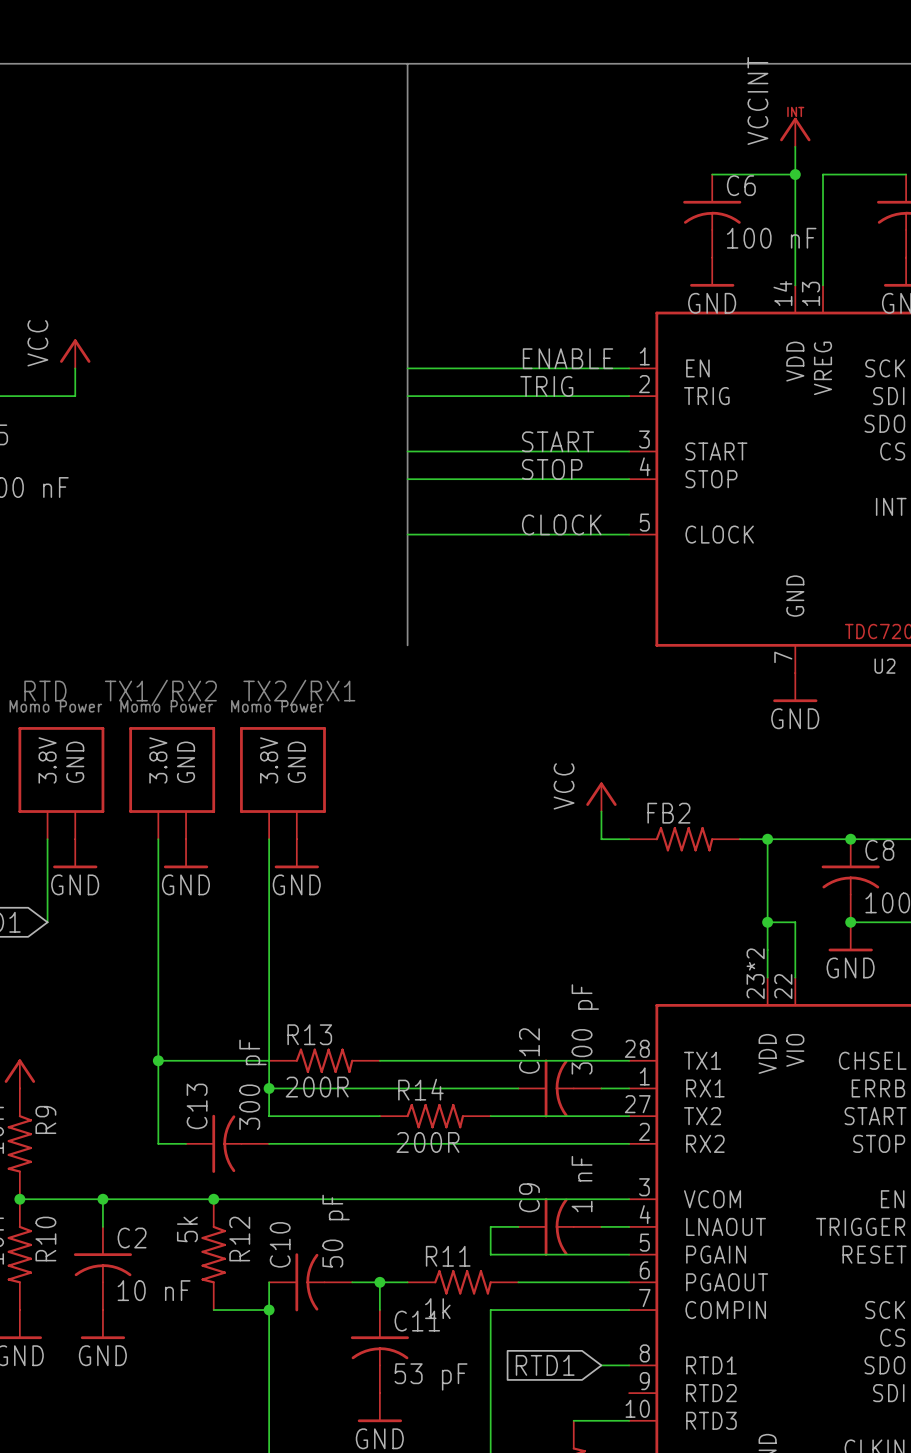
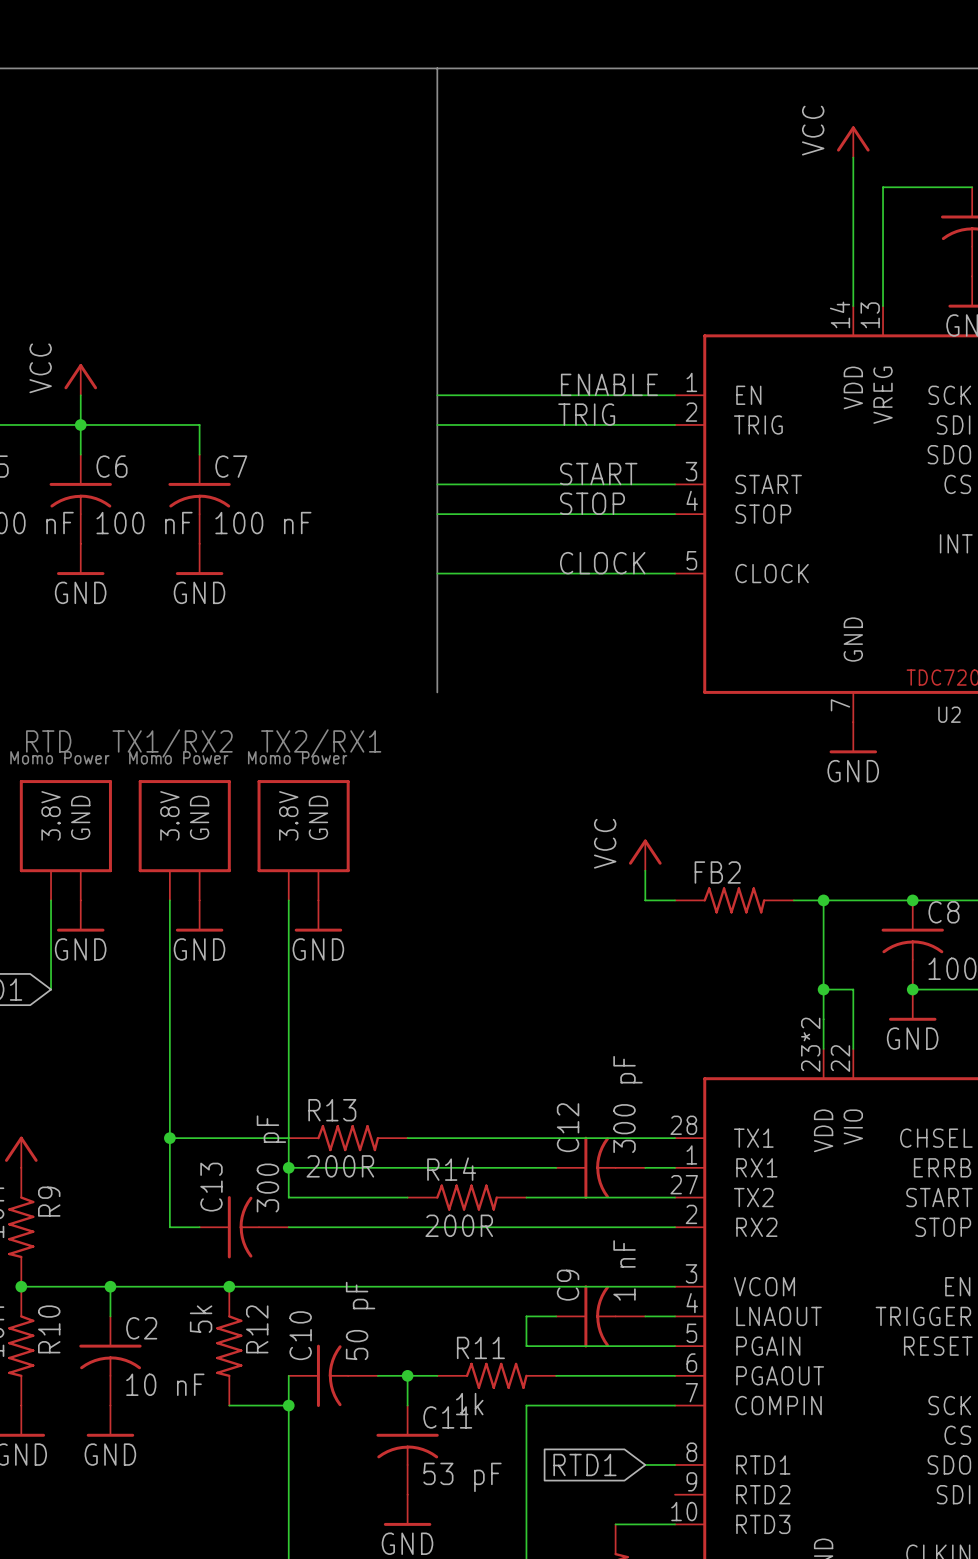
power symbol: VCCINT (795, 132) -> VCC (853, 141)
wire: (712, 174) (795, 174) -> none
junction: (795, 174) -> none
C6 position: (712, 216) -> (80, 499)
power symbol: GND (712, 272) -> none
junction: none -> (80, 424)
wire: none -> (80, 454) (80, 424) (199, 424) (199, 454)
C7: none -> 100 nF (199, 499)
power symbol: none -> GND (80, 559)
power symbol: none -> GND (199, 559)

